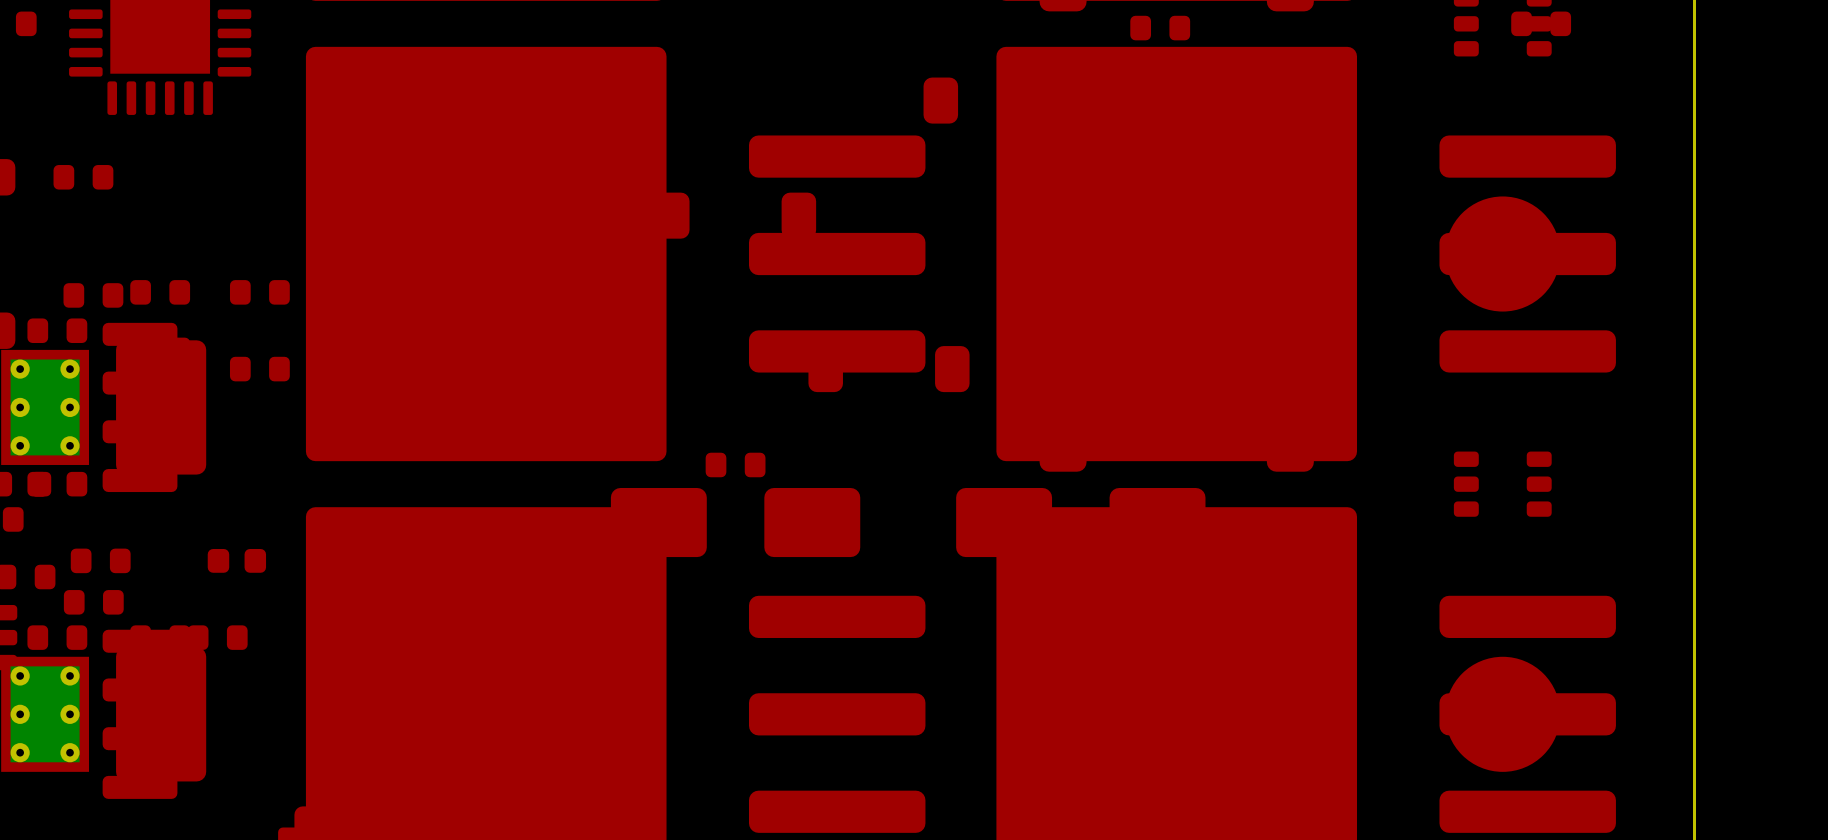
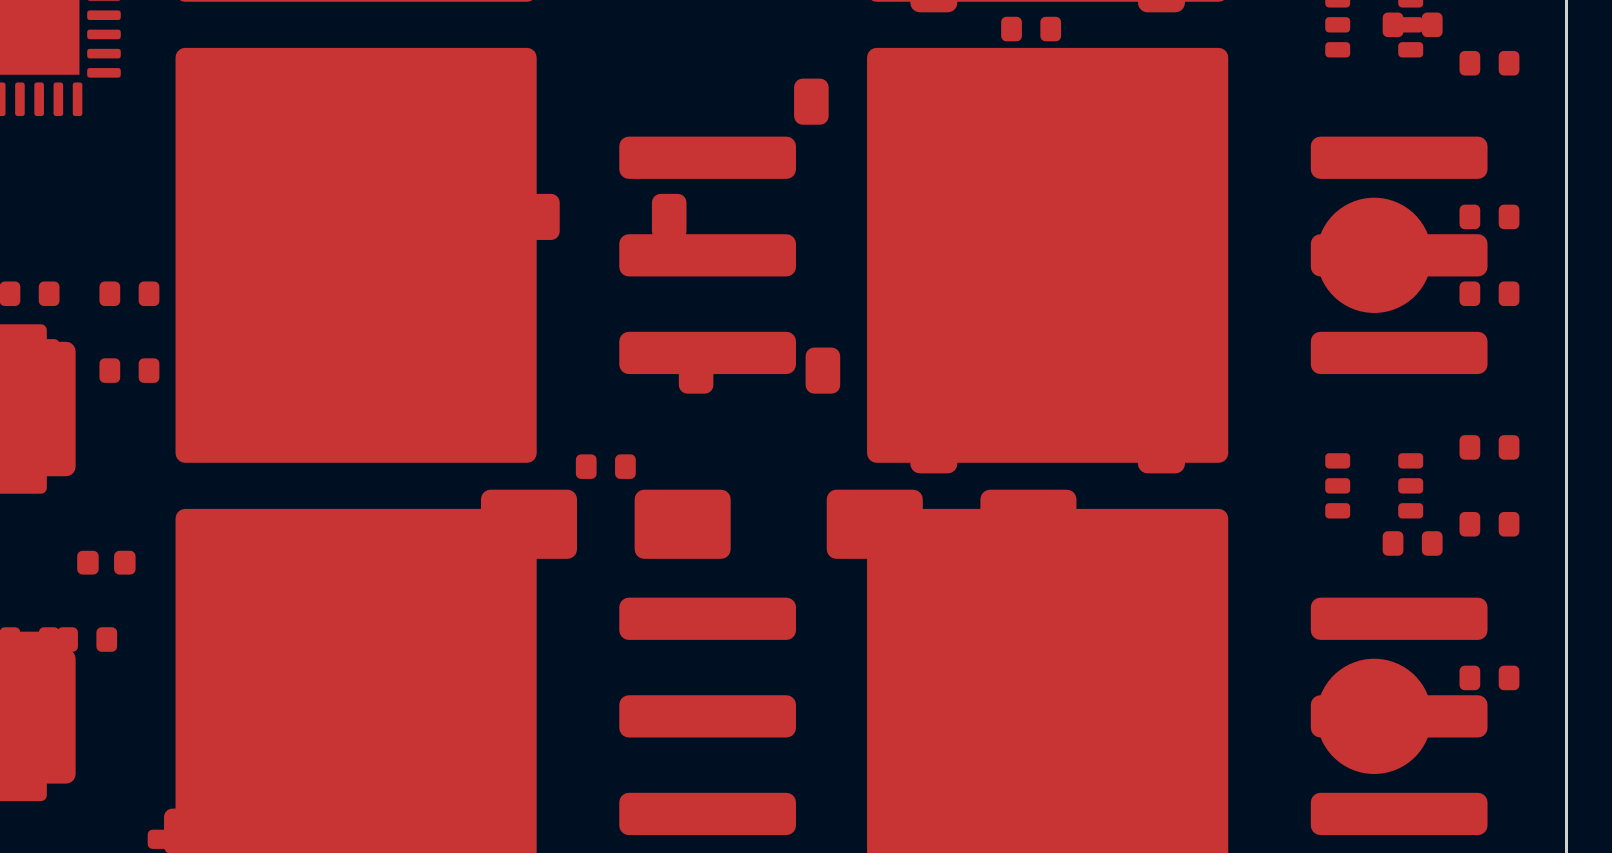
part: none -> (1489, 63)
part: none -> (1489, 216)
part: none -> (1489, 293)
part: none -> (1489, 447)
part: none -> (1489, 524)
part: none -> (1412, 543)
part: none -> (1489, 677)

